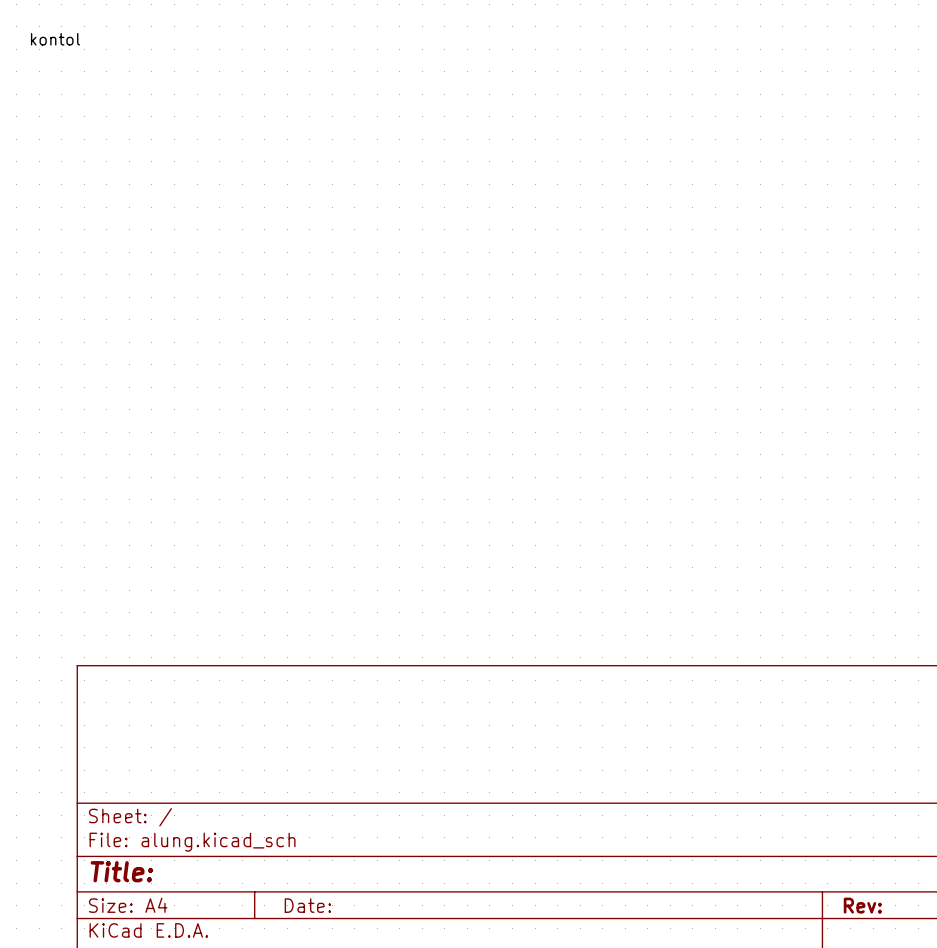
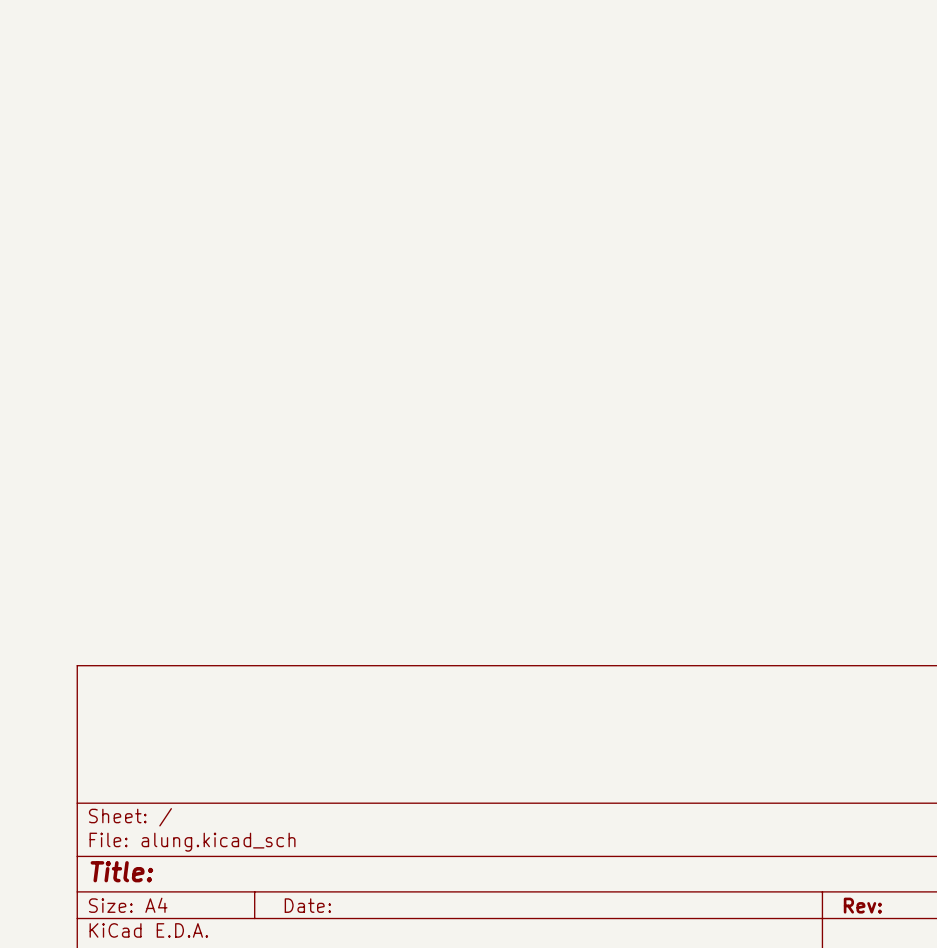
label: kontol (55, 39) -> none

